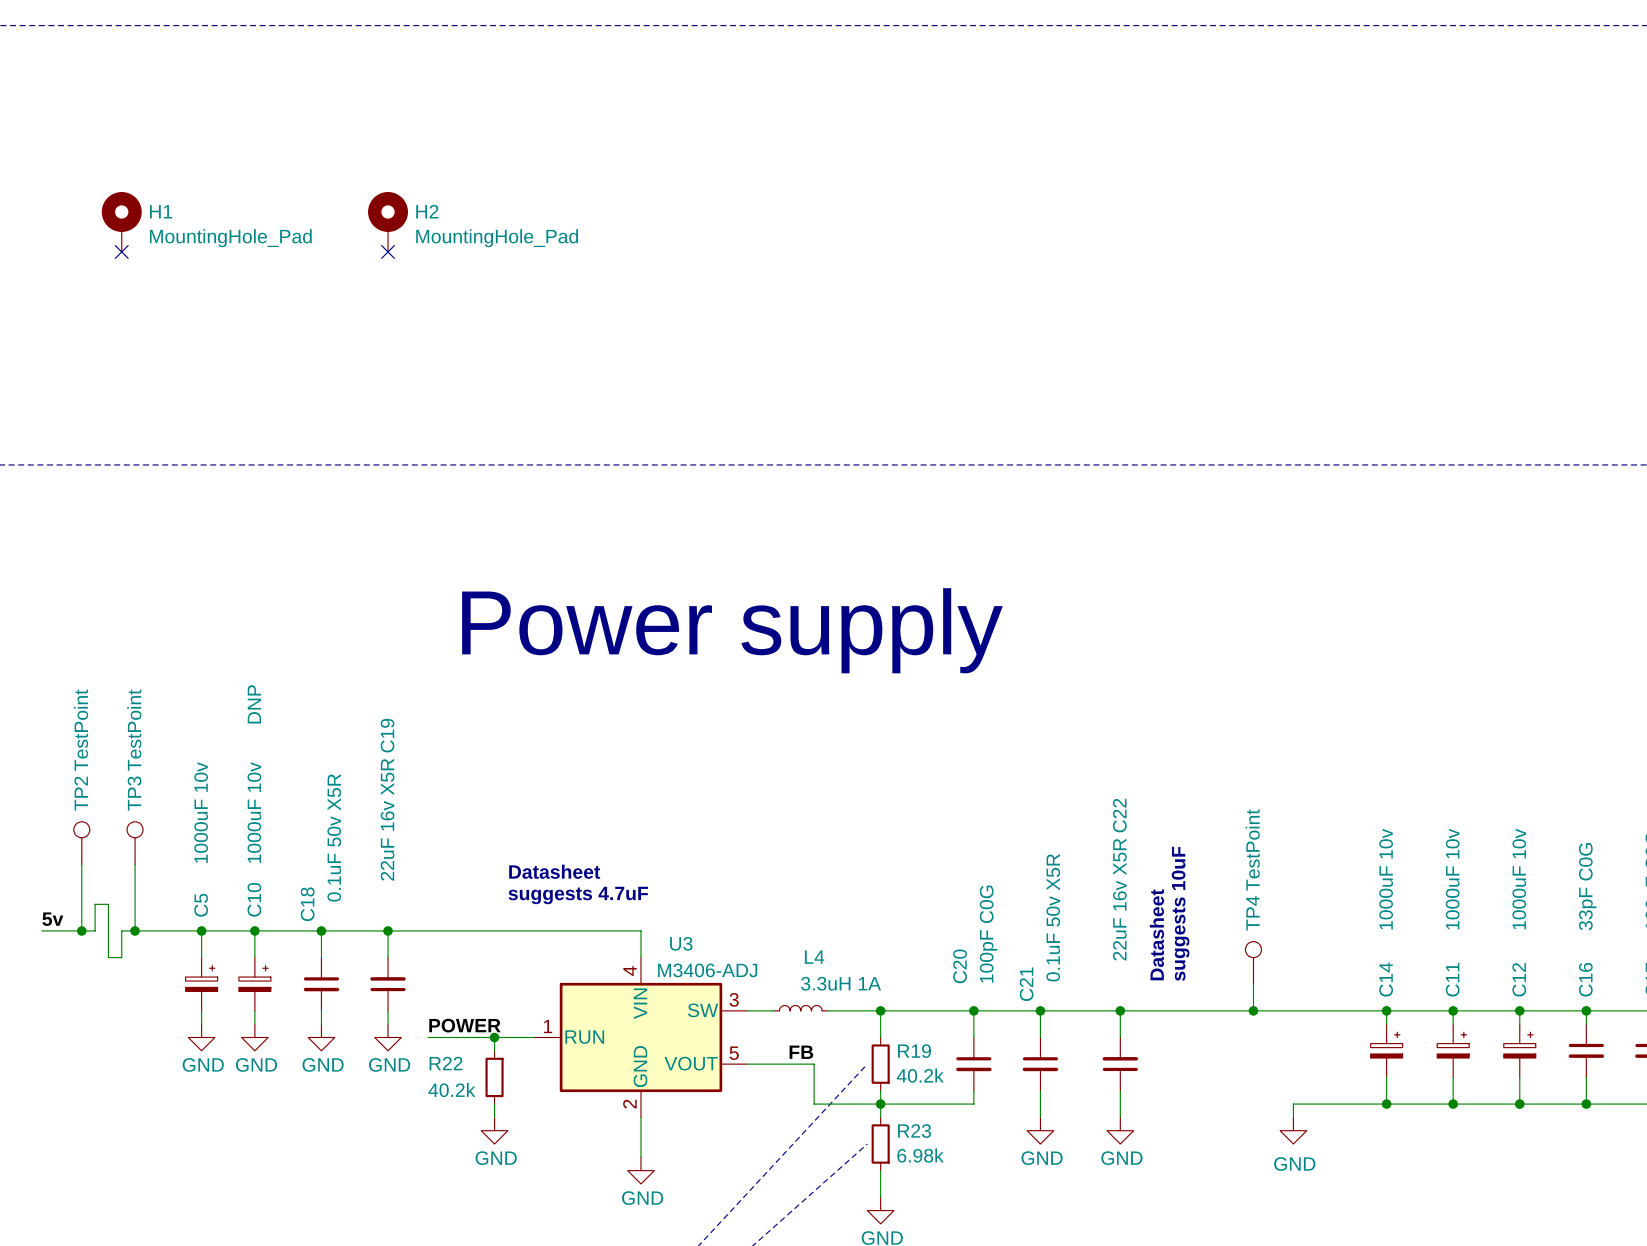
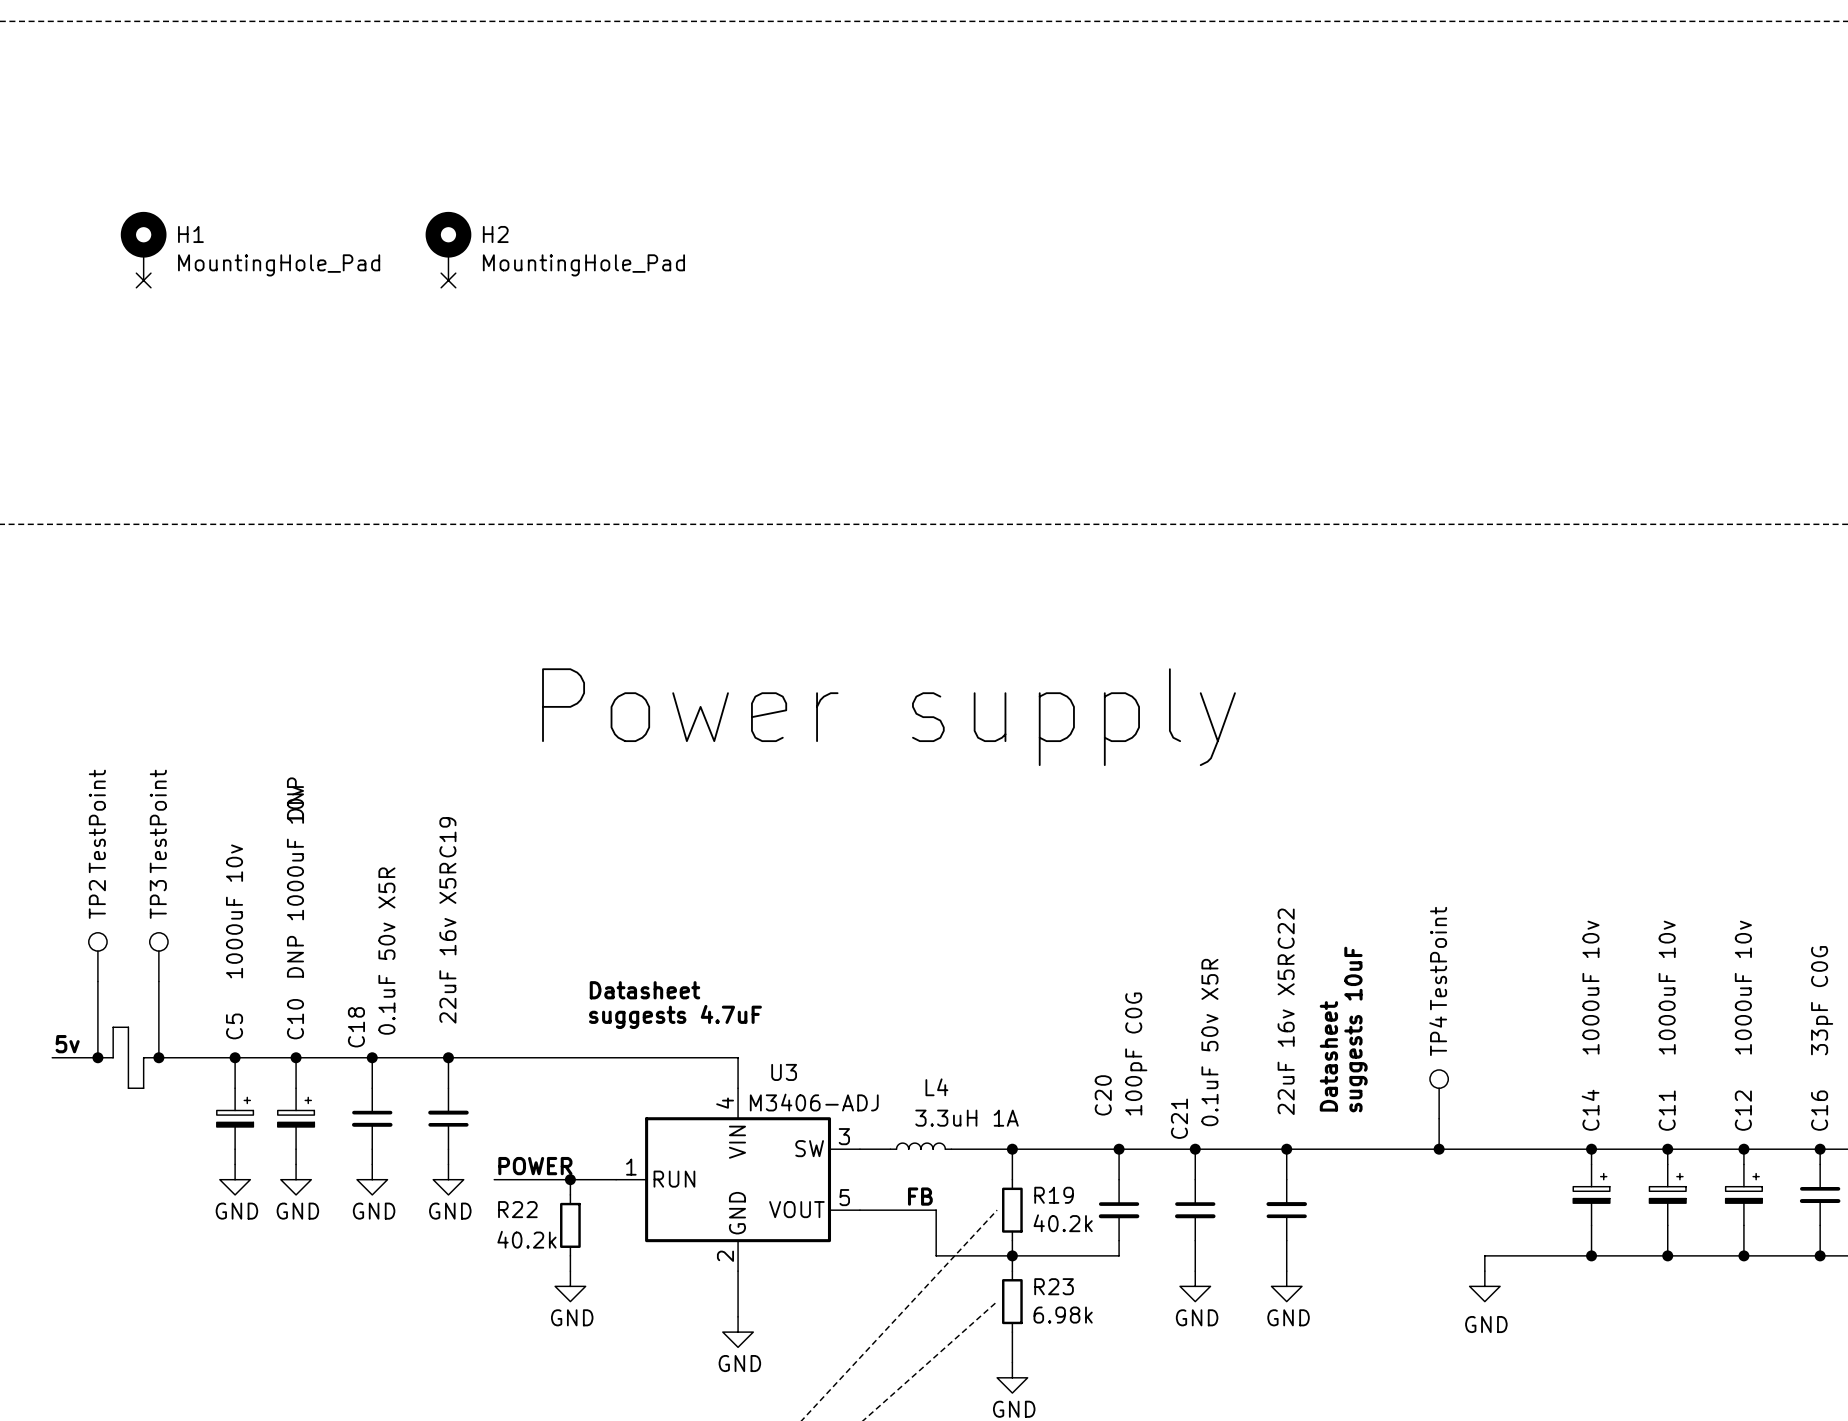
C10 value: 1000uF 10v (254, 812) -> DNP 1000uF 10v (295, 882)

